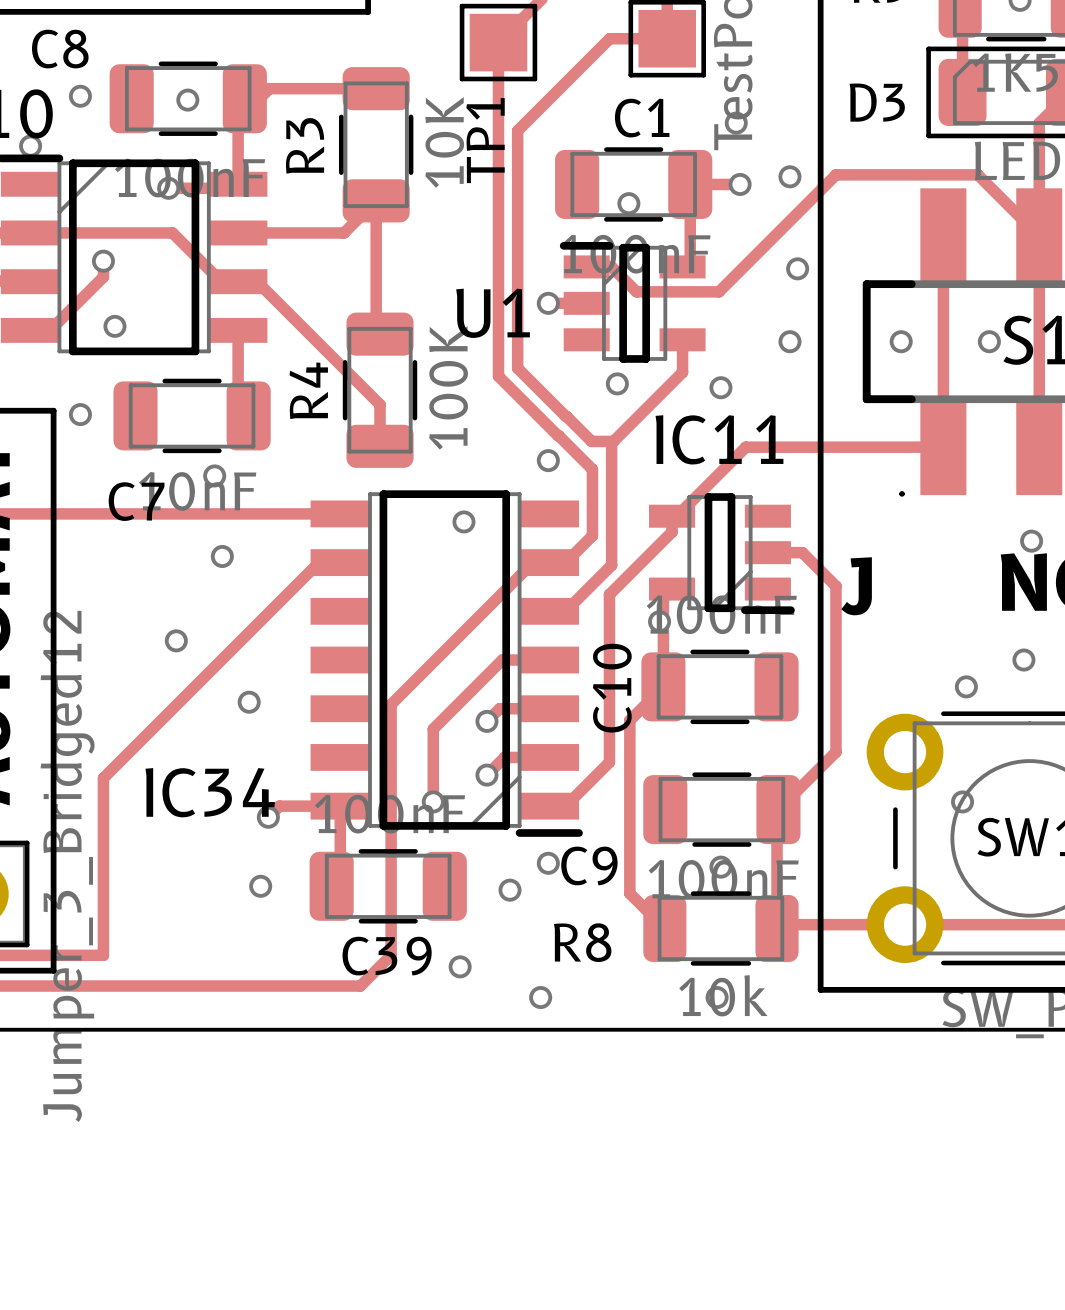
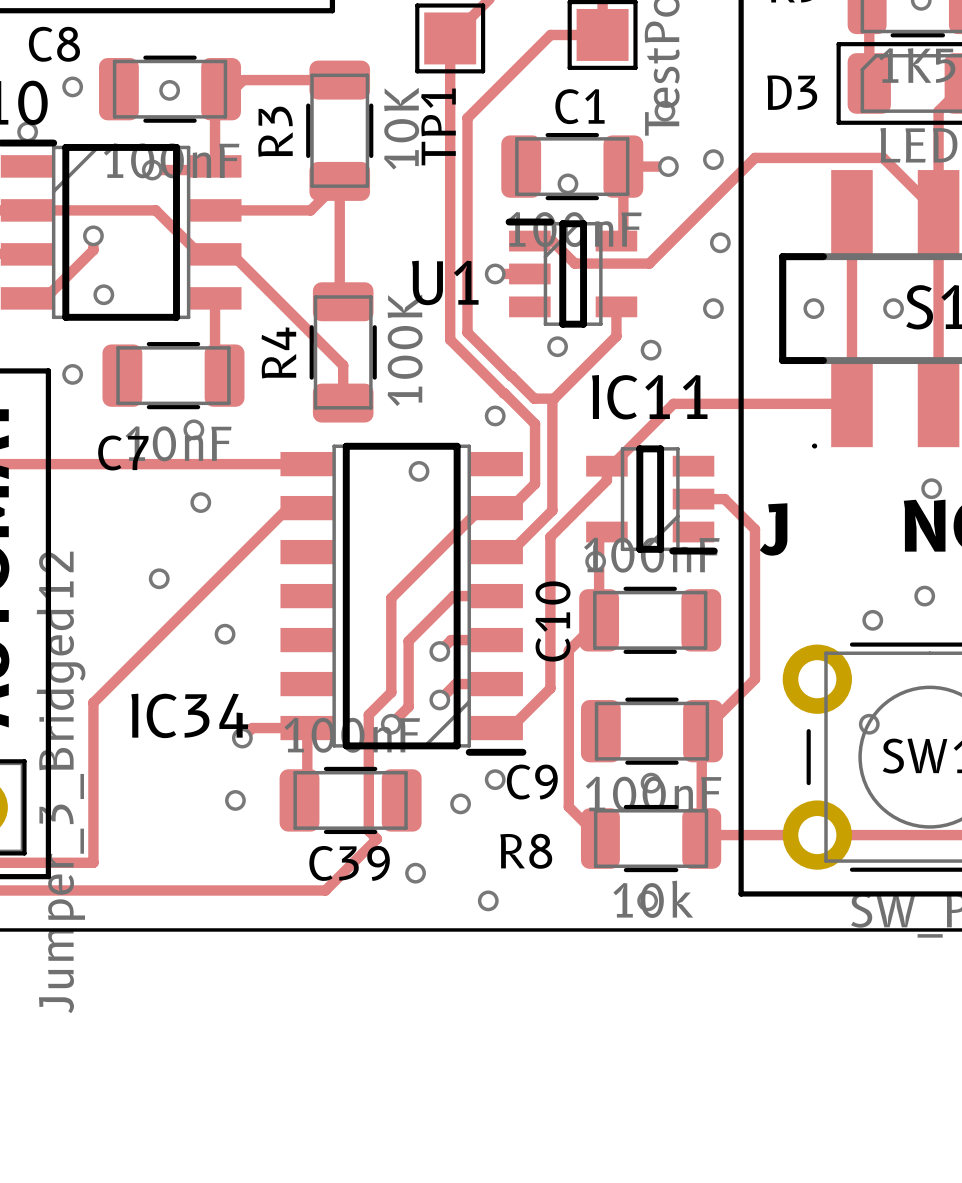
track: (433, 662) (391, 704) (391, 955) -> (391, 692) (368, 714) (368, 830) (376, 839) (353, 862)
track: (452, 709) (433, 729) -> (391, 598) (391, 658)
track: (433, 766) (433, 801) -> (408, 641) (408, 706) (391, 724)

